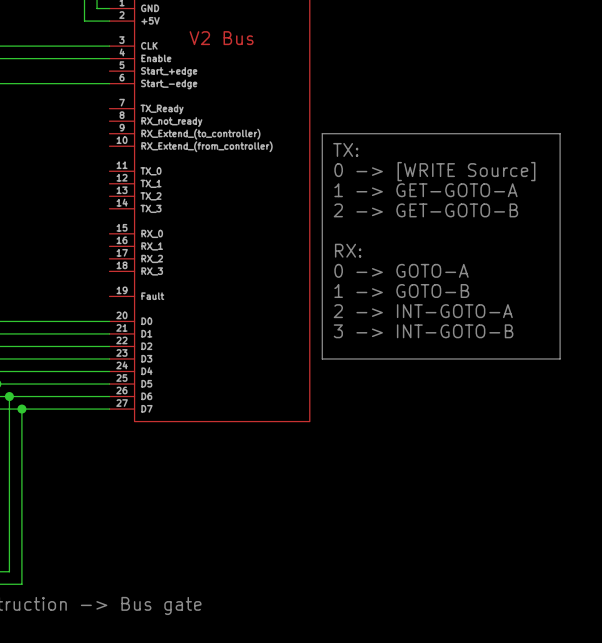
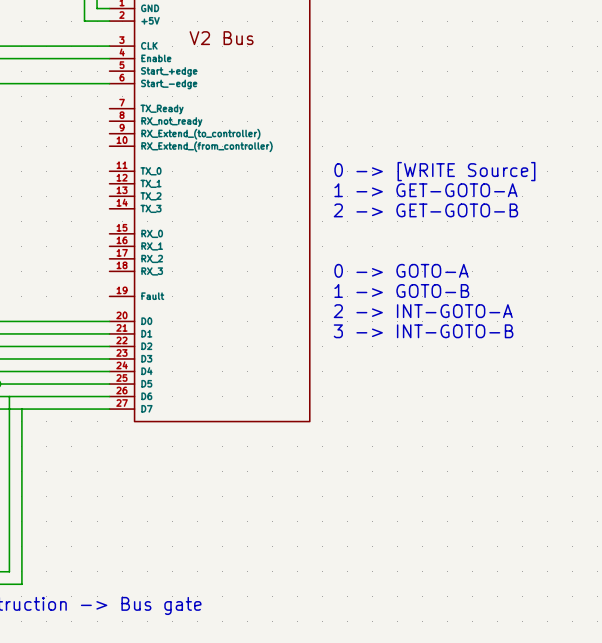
line: (322, 133) (560, 133) (560, 358) (322, 358) (322, 133) -> none
text: TX: (345, 149) -> none
text: RX: (348, 250) -> none
junction: (9, 396) -> none
junction: (21, 409) -> none

